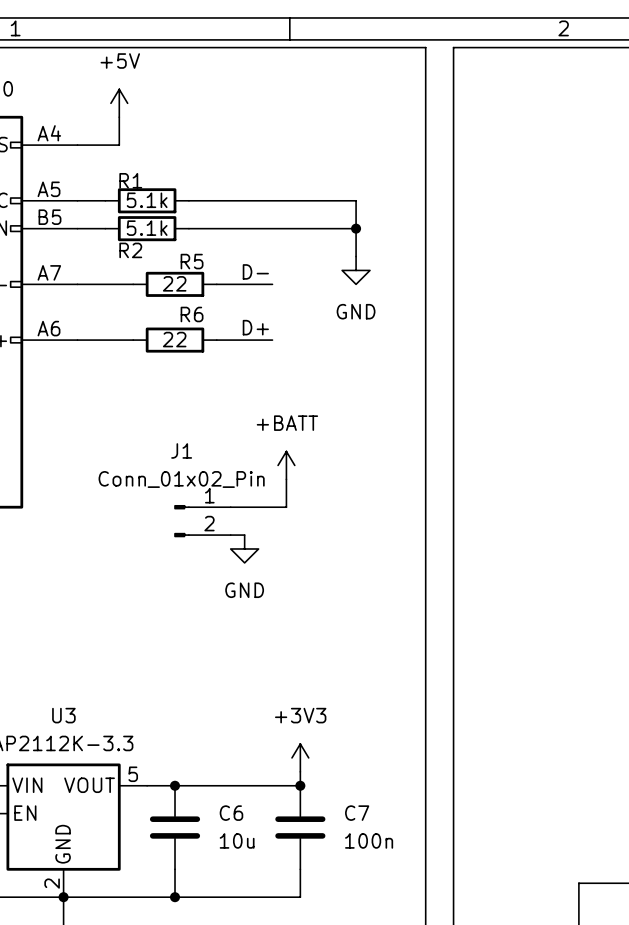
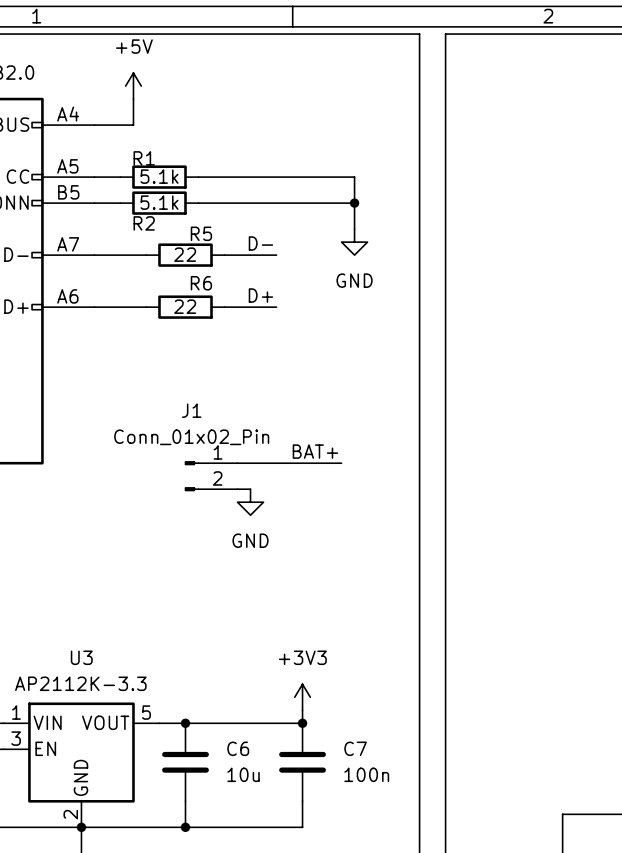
power symbol: +BATT (286, 465) -> none
wire: (286, 479) (286, 507) -> (341, 463) (289, 463)
label: none -> BAT+ (315, 451)

